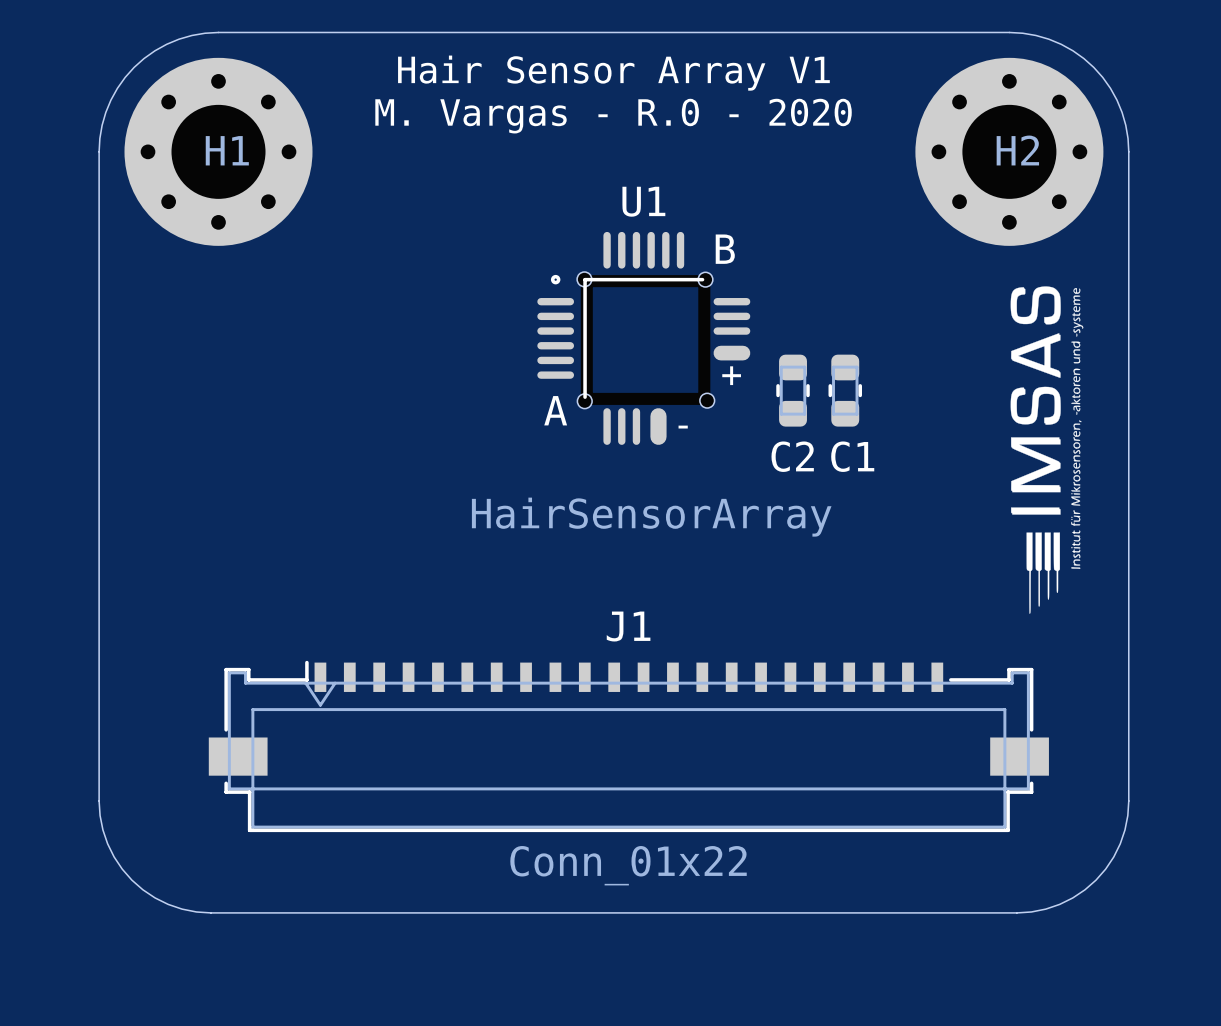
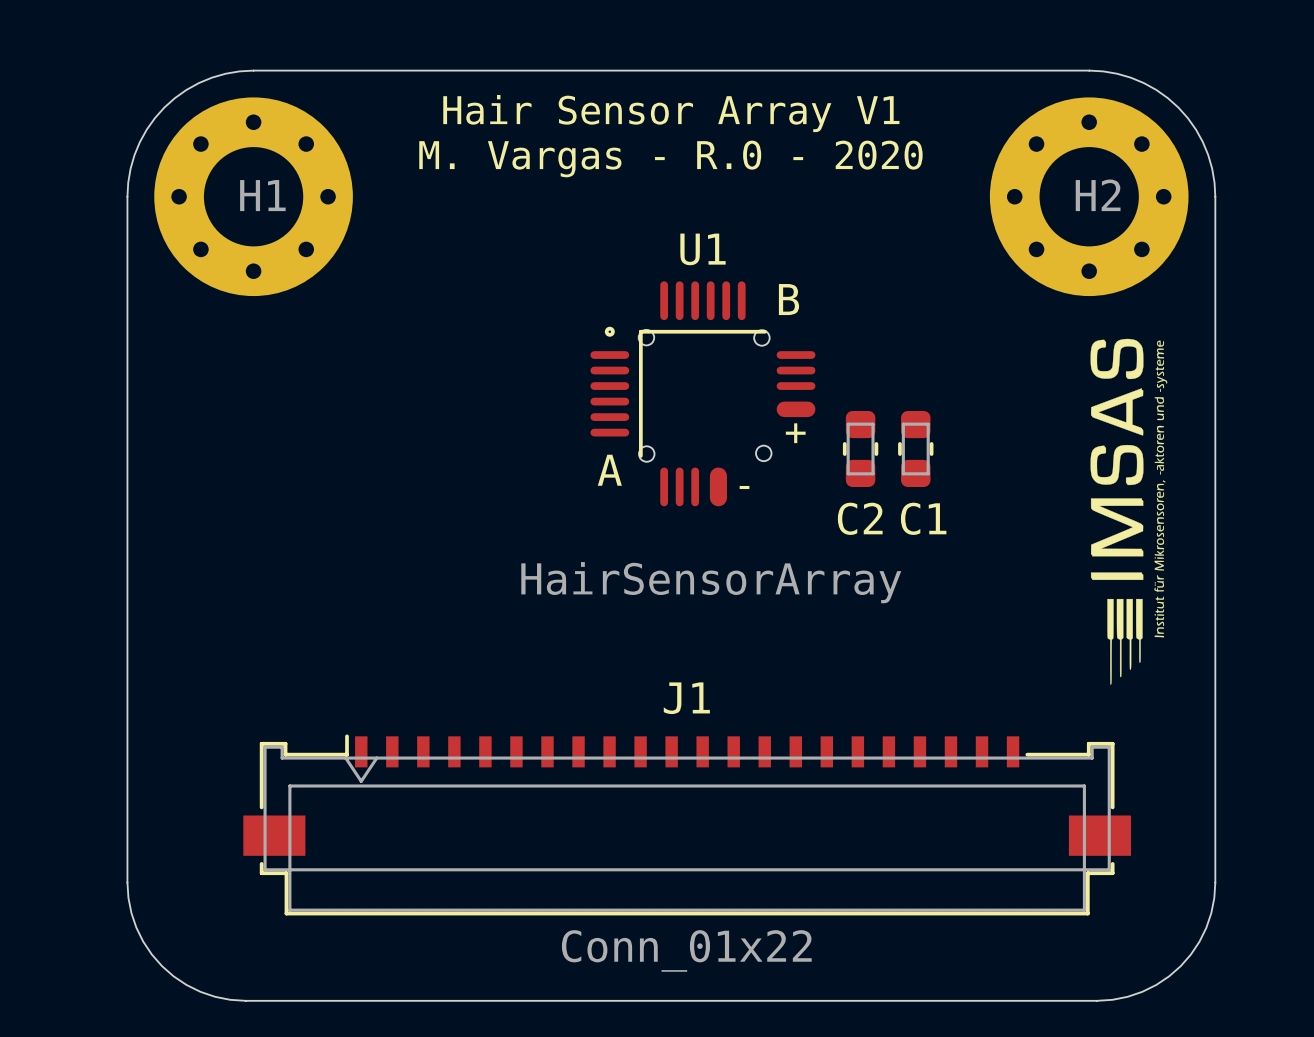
U1 footprint: [537, 231, 751, 445] -> [590, 281, 816, 507]

